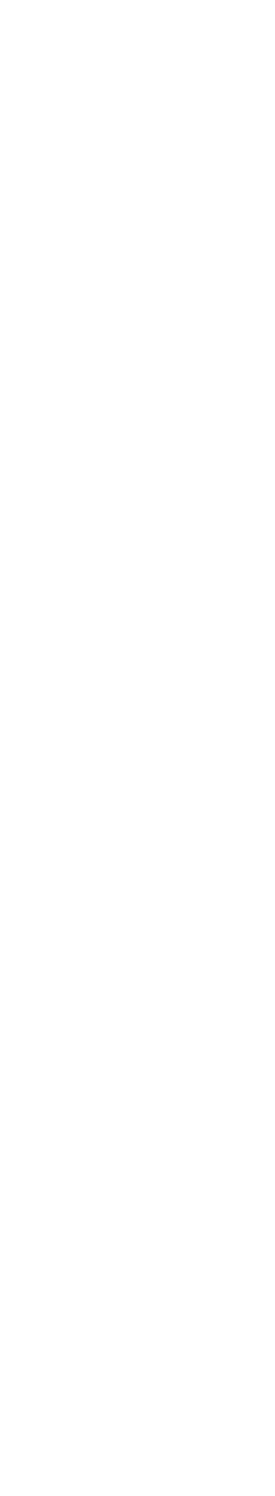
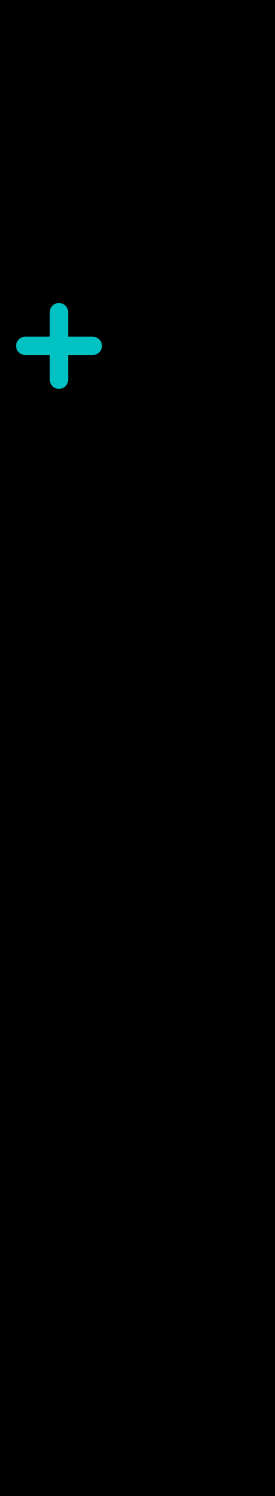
line: none -> (58, 312) (58, 379)
line: none -> (25, 345) (92, 345)

